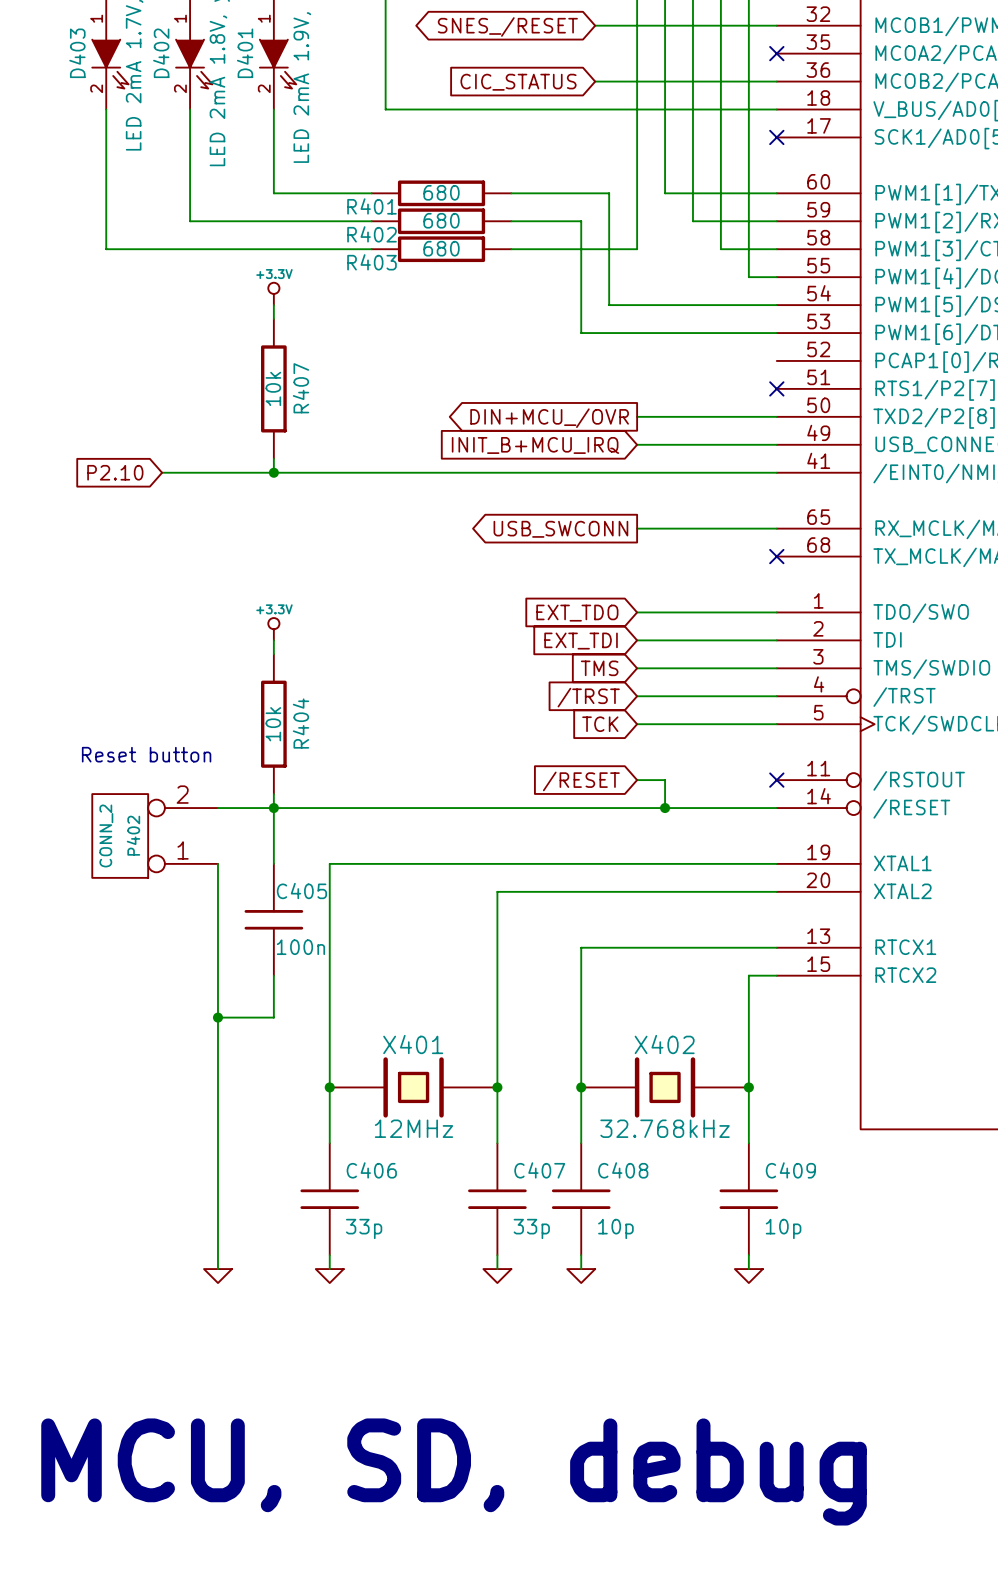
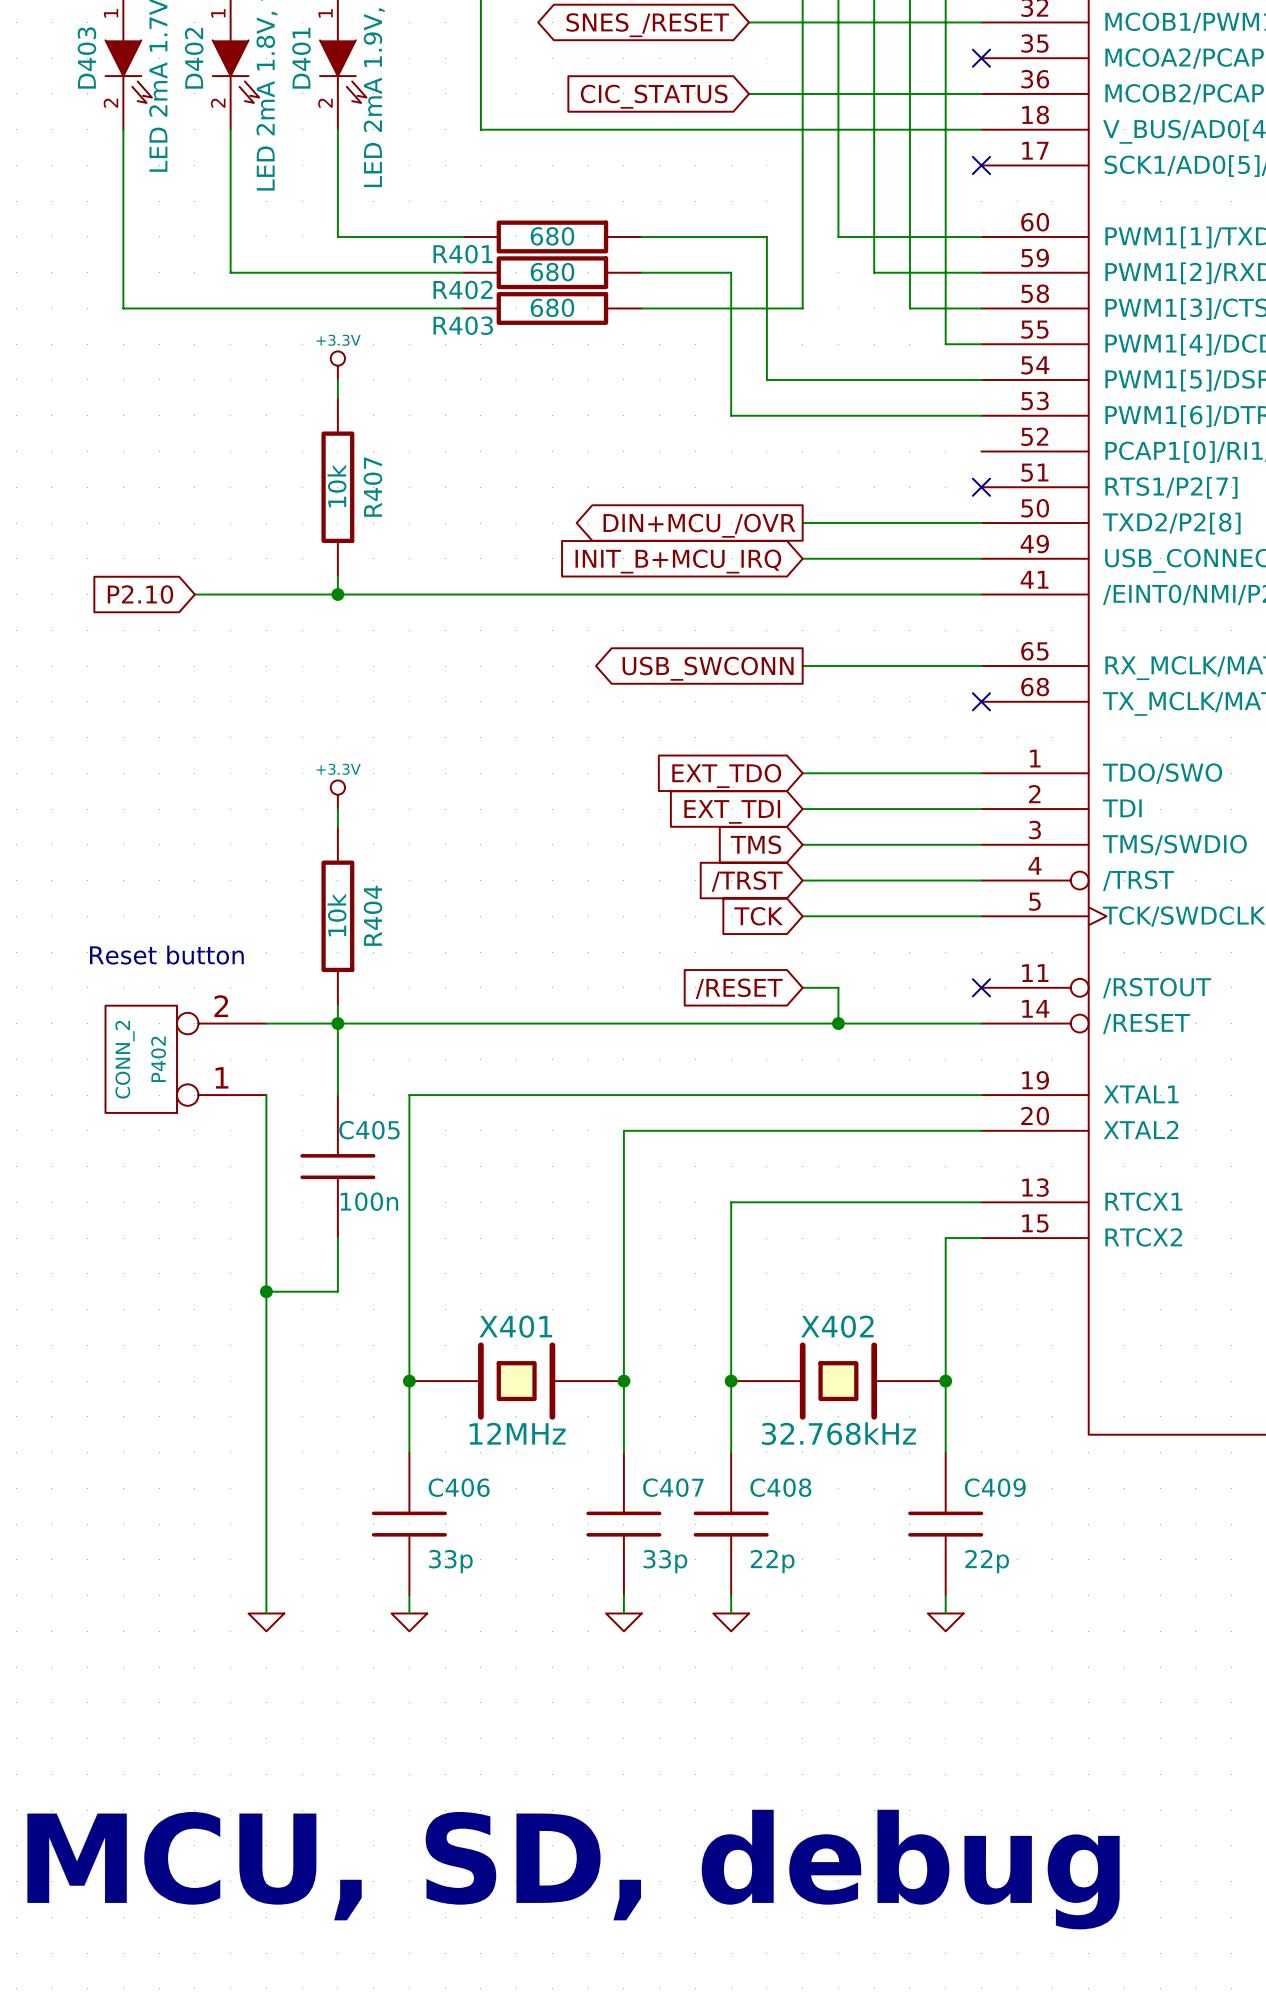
C408 value: 10p (615, 1228) -> 22p (772, 1561)
C409 value: 10p (783, 1228) -> 22p (987, 1561)

